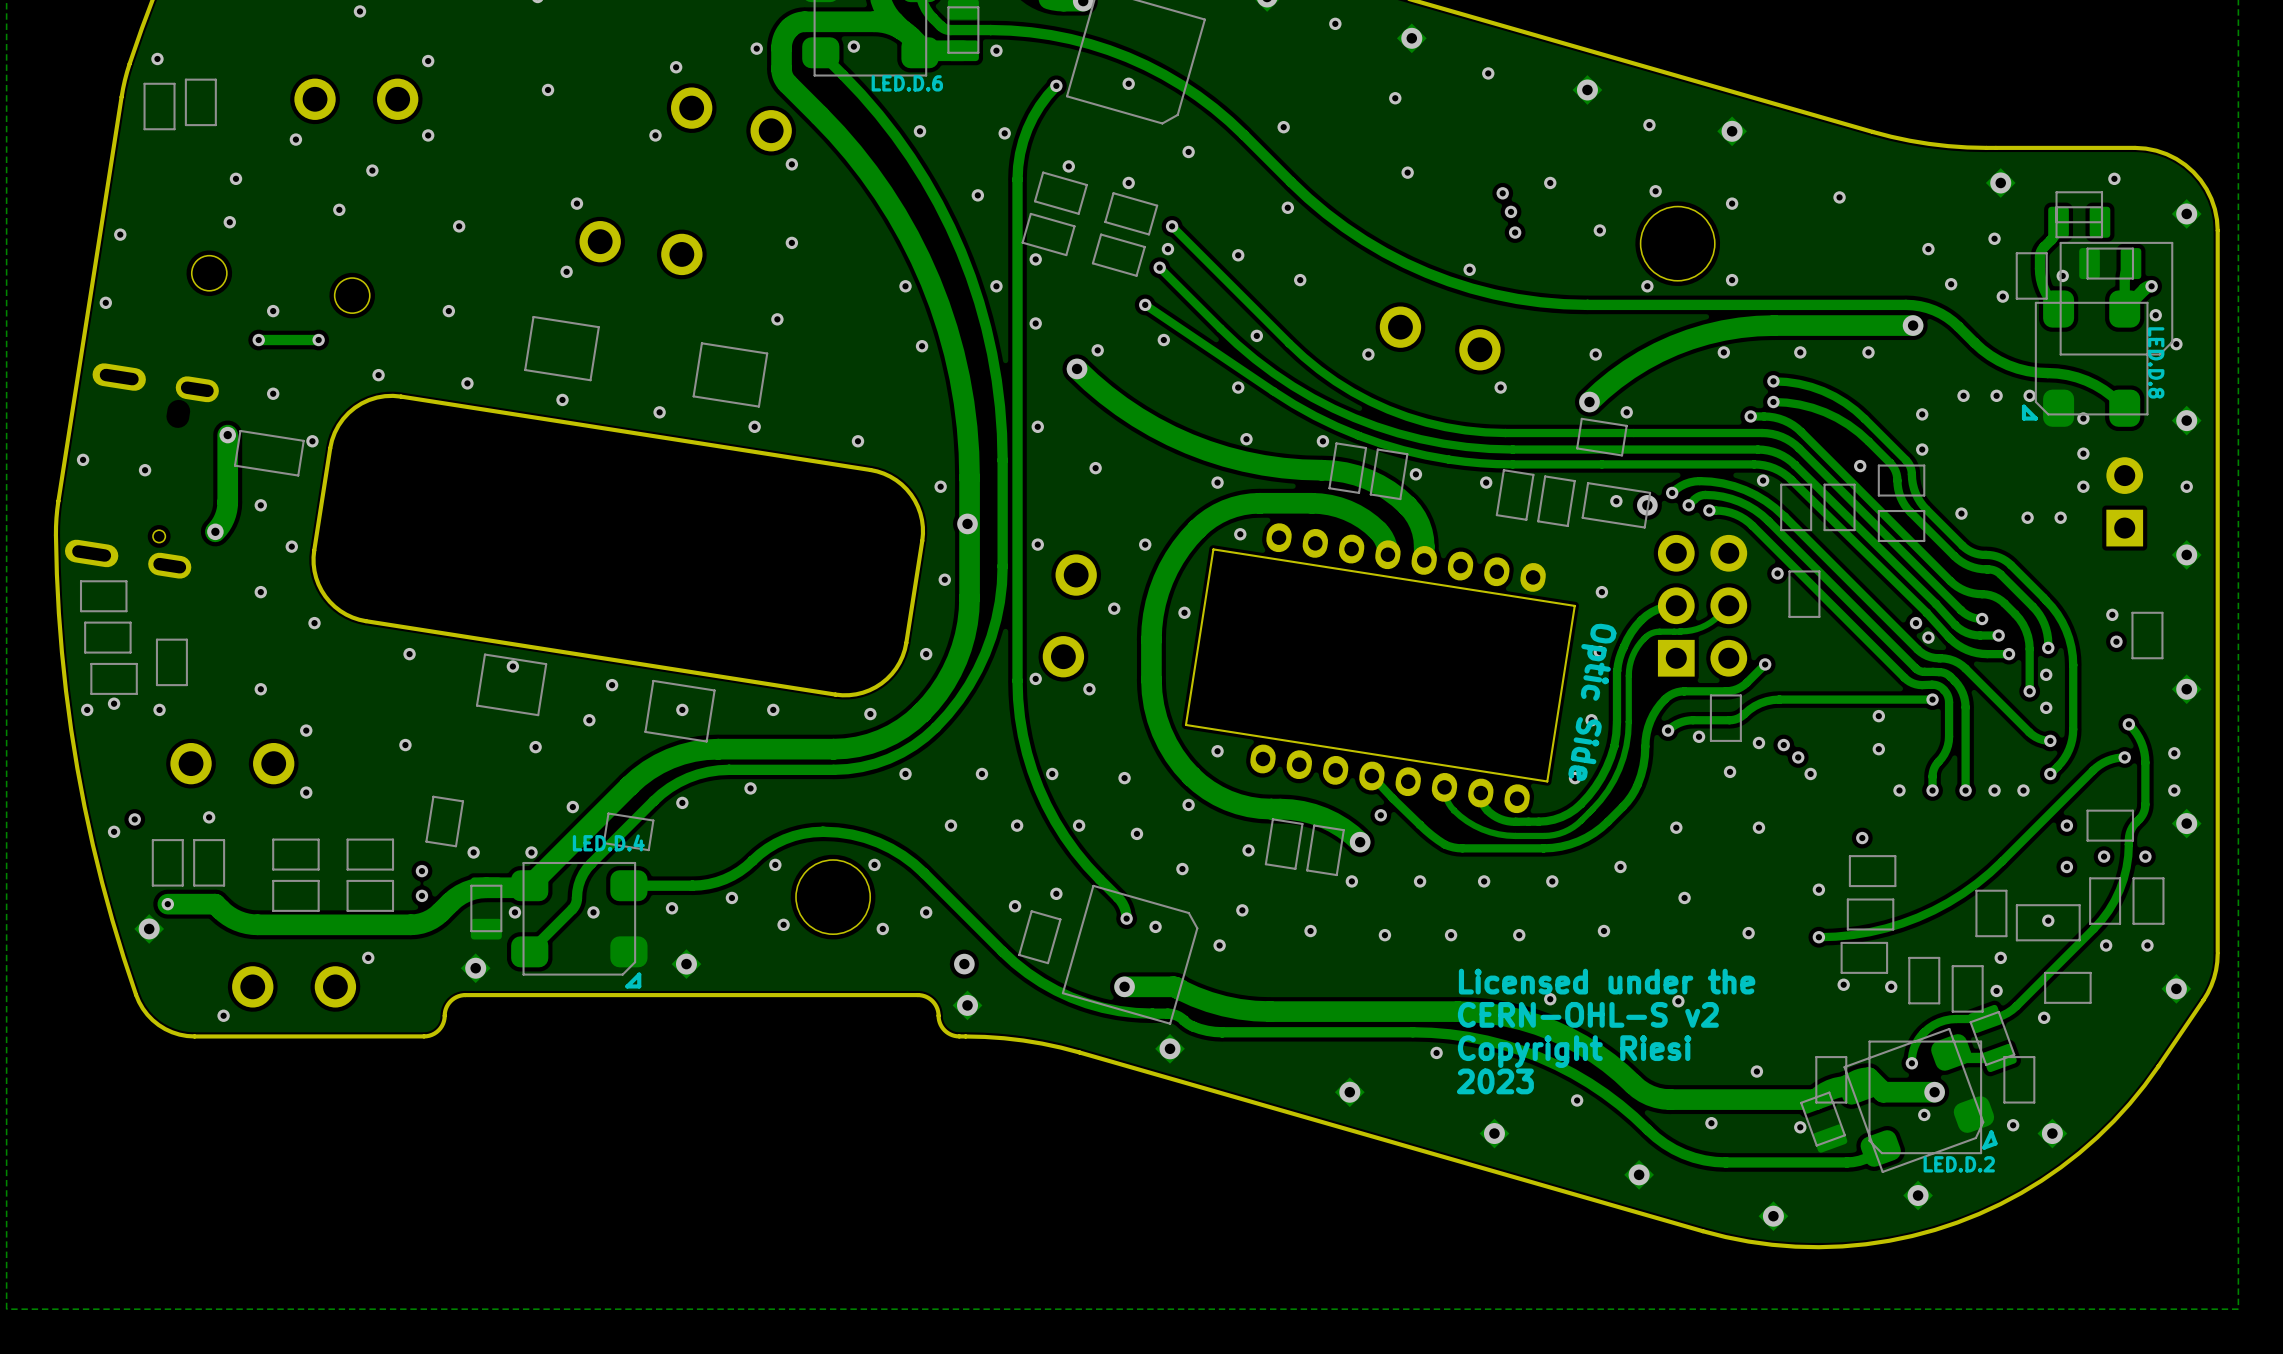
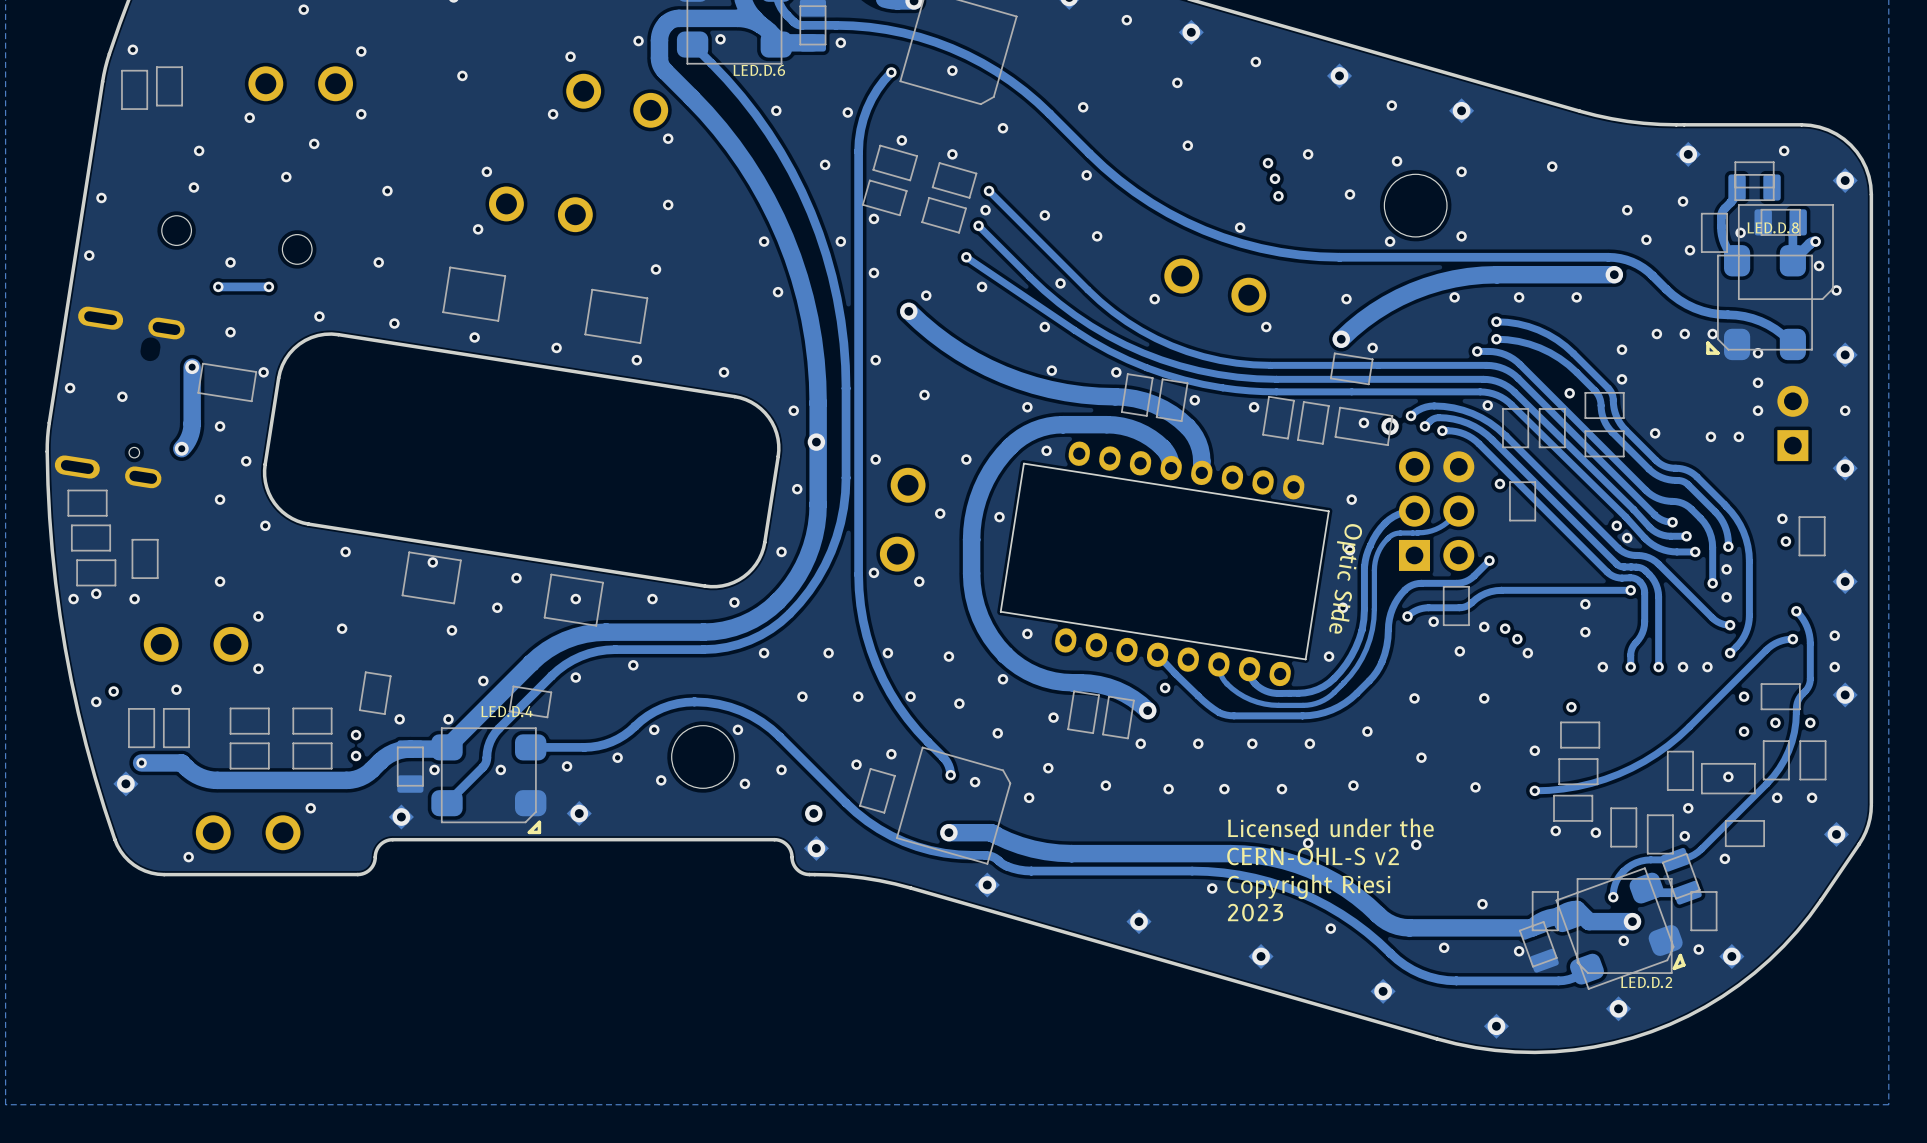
LED.D.8 name rotation: 0° (2156, 362) -> 90° counterclockwise (1773, 227)
LED.D.8 name position: LED.D.8 (2156, 362) -> LED.D.8 (1773, 227)

